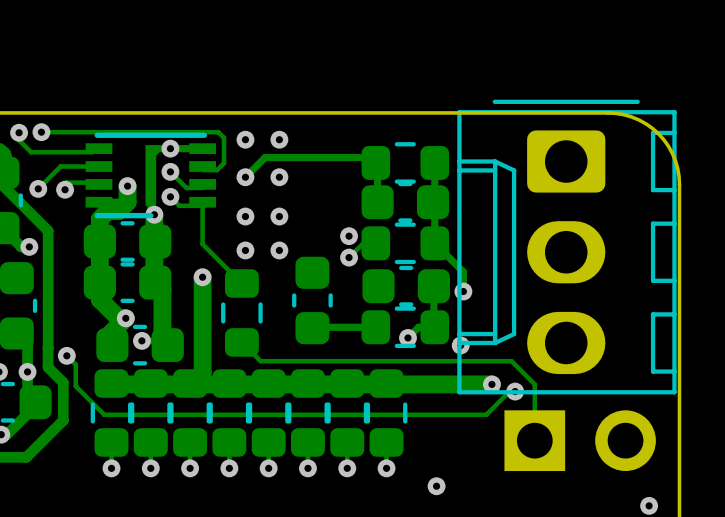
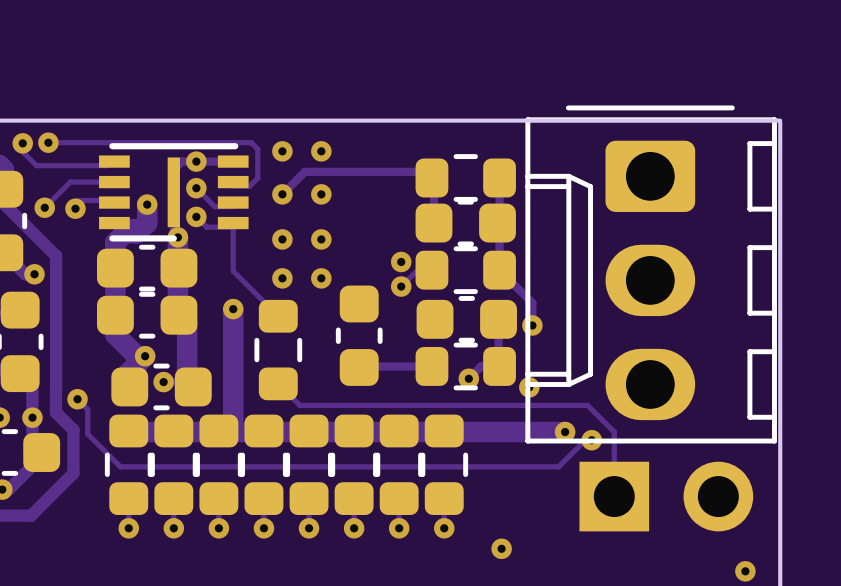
board edge: (608, 112) (631, 116) (646, 123) (658, 133) (672, 153) (677, 168) (679, 184) -> (698, 120) (780, 120)
board edge: none -> (780, 122) (780, 202)

